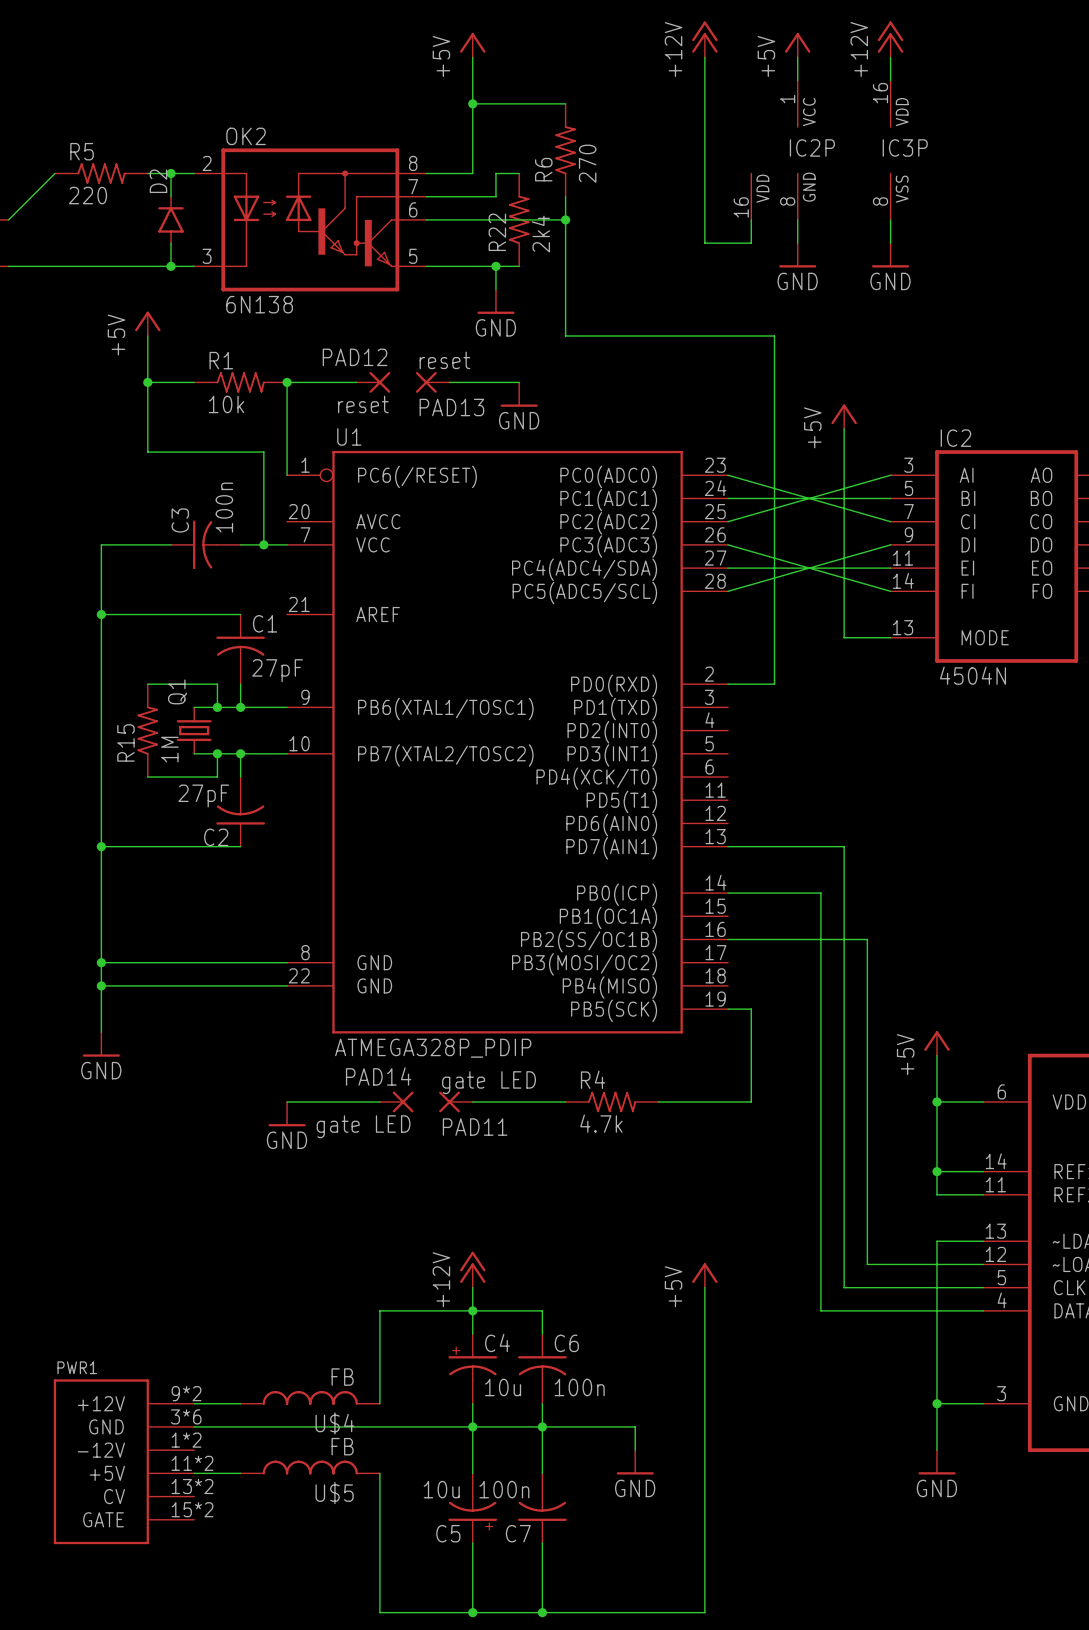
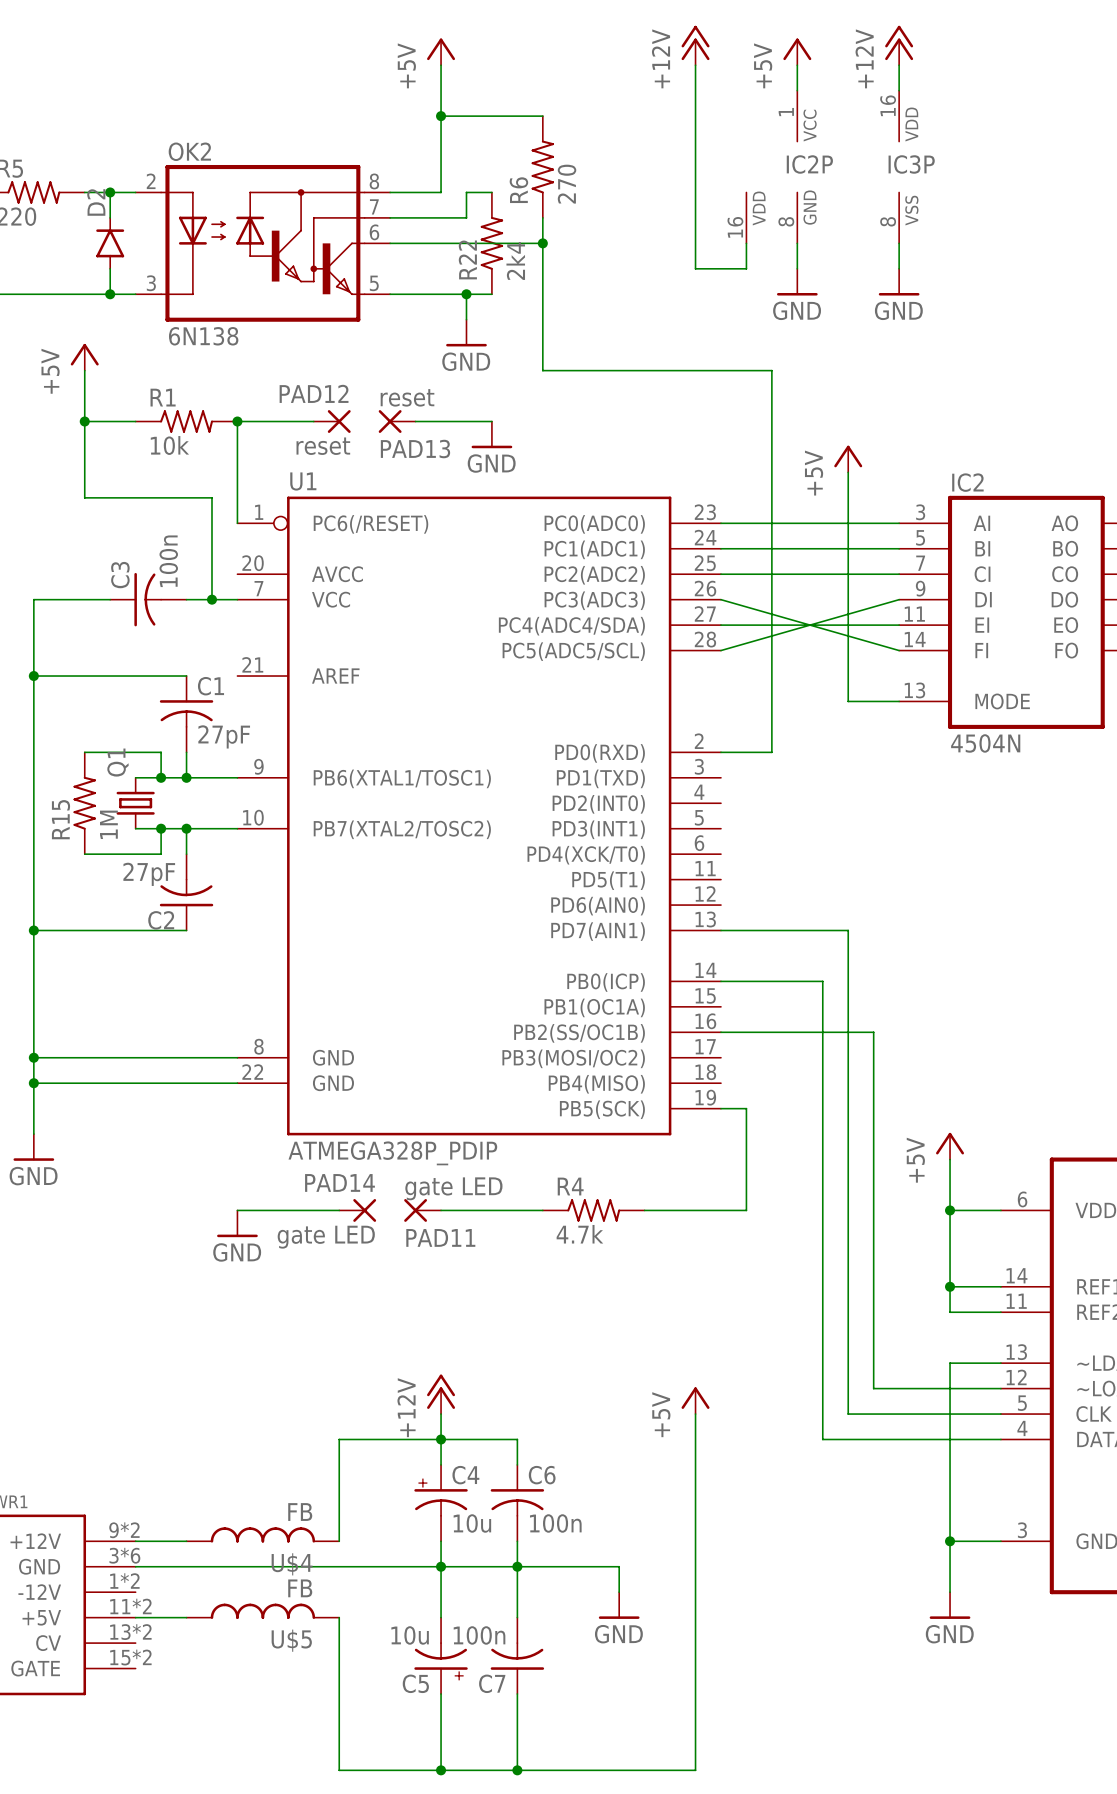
wire: (728, 475) (890, 521) -> (720, 523) (899, 523)
wire: (890, 475) (728, 521) -> (899, 574) (720, 574)

